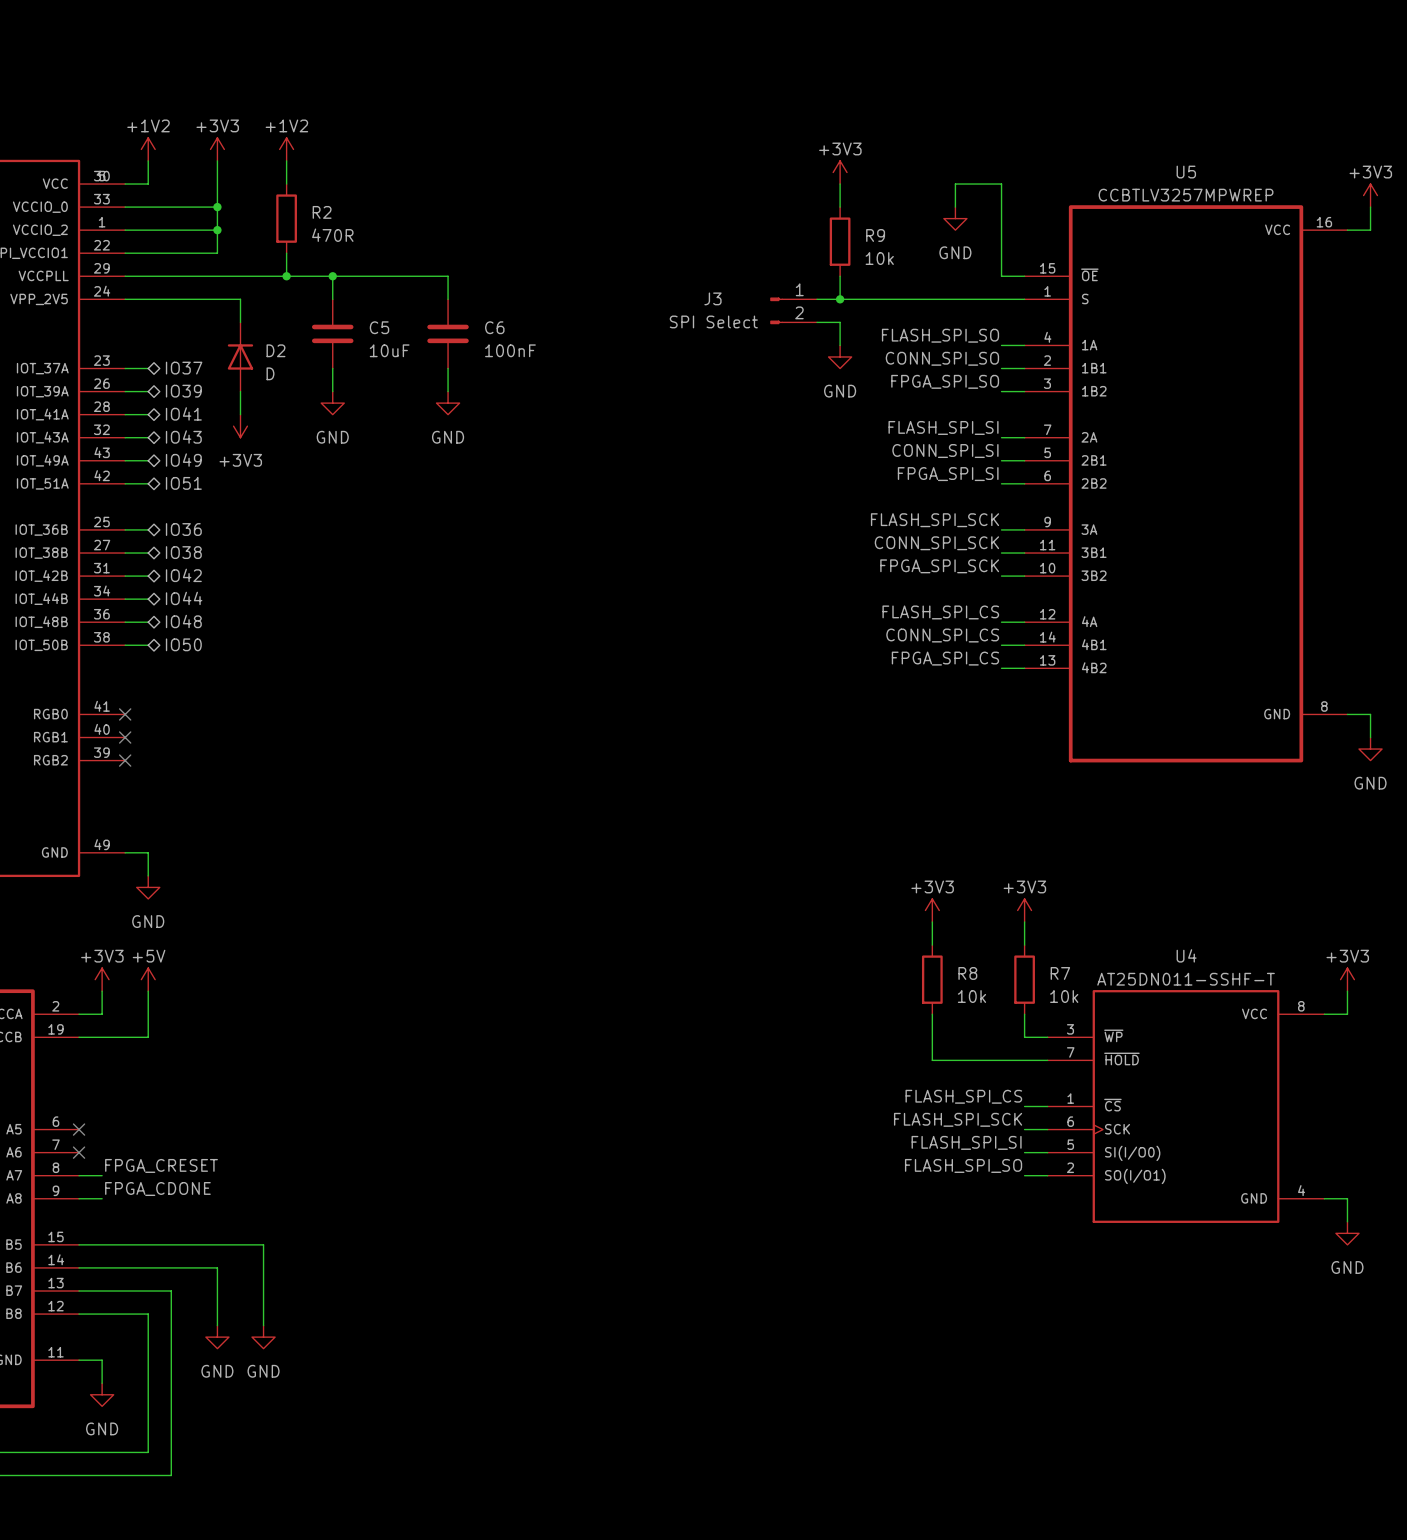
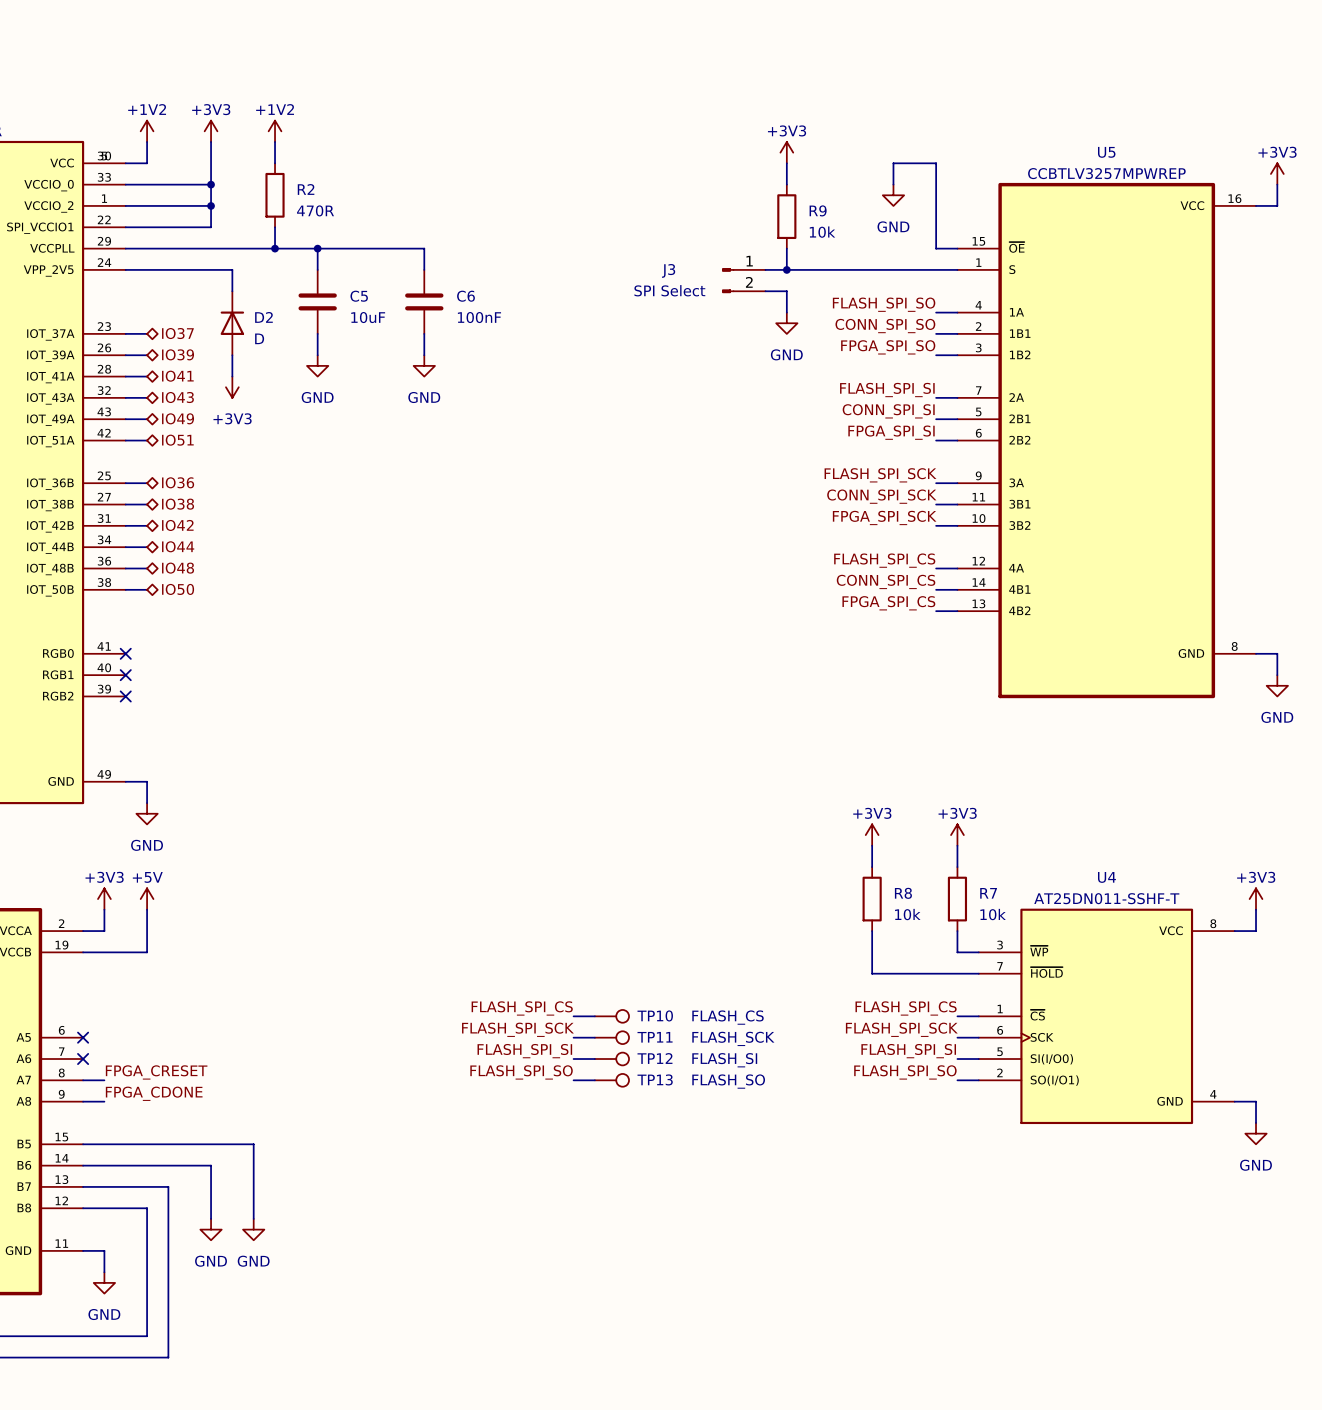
label: none -> FLASH_SPI_CS (522, 1008)
wire: none -> (573, 1016) (594, 1016)
TP10: none -> FLASH_CS (611, 1016)
label: none -> FLASH_SPI_SCK (517, 1029)
wire: none -> (573, 1037) (594, 1037)
TP11: none -> FLASH_SCK (611, 1037)
label: none -> FLASH_SPI_SI (524, 1051)
wire: none -> (573, 1059) (594, 1059)
TP12: none -> FLASH_SI (611, 1059)
label: none -> FLASH_SPI_SO (521, 1072)
wire: none -> (573, 1080) (594, 1080)
TP13: none -> FLASH_SO (611, 1080)

